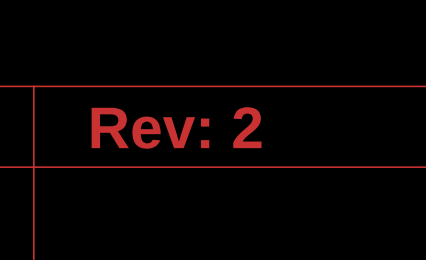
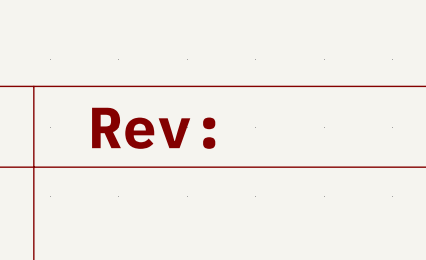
title block: Rev: 2 (176, 127) -> Rev: (153, 128)

